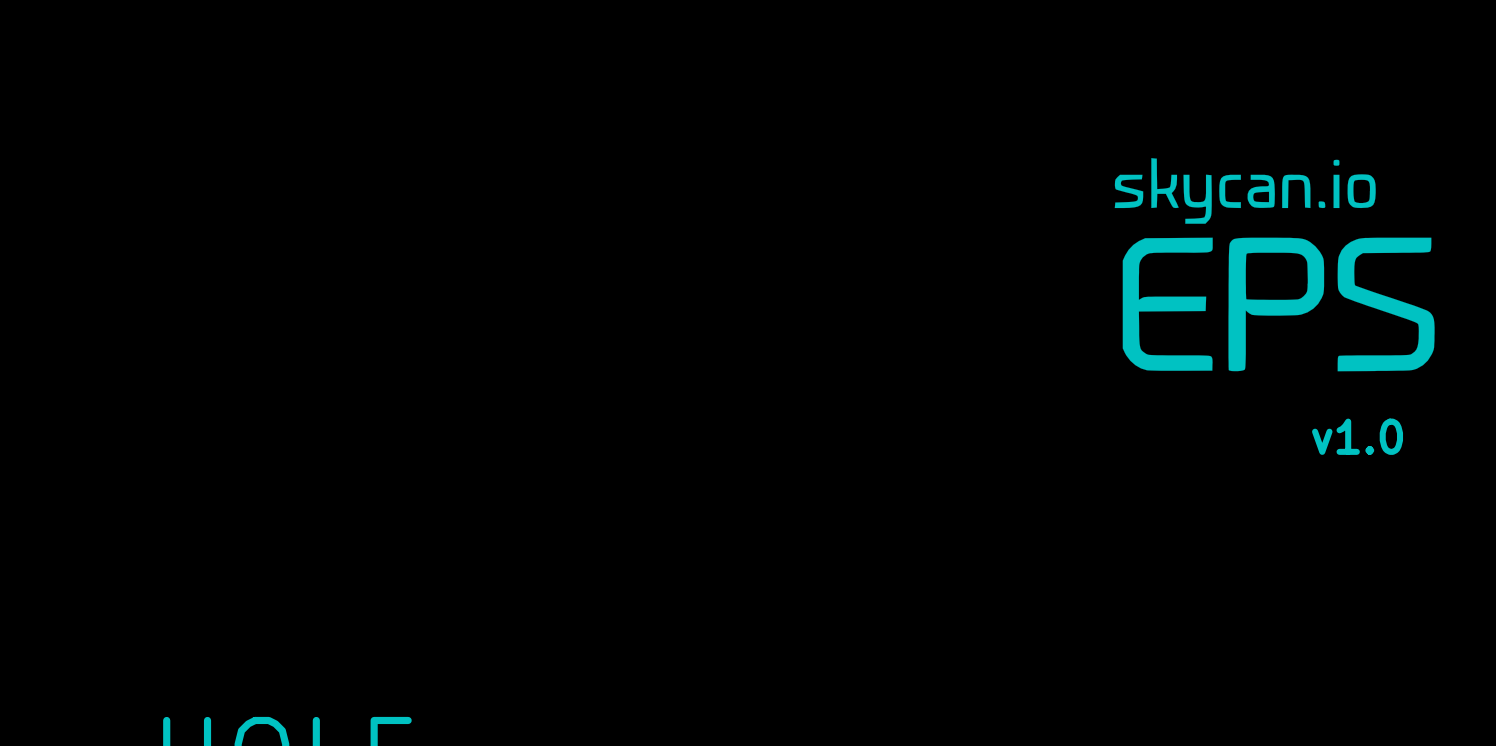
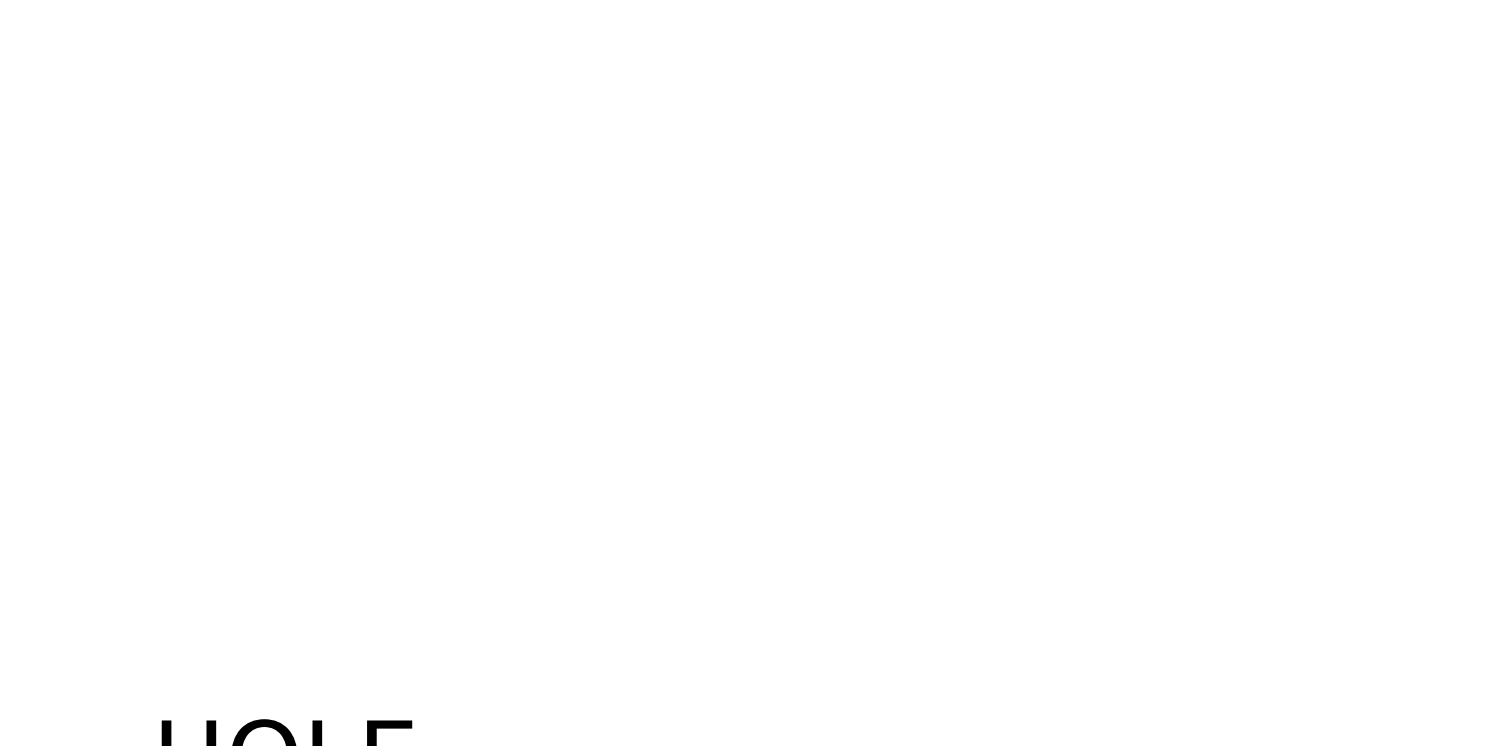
drawing: [1114, 158, 1435, 372] -> none
text: v1.0 (1357, 436) -> none

